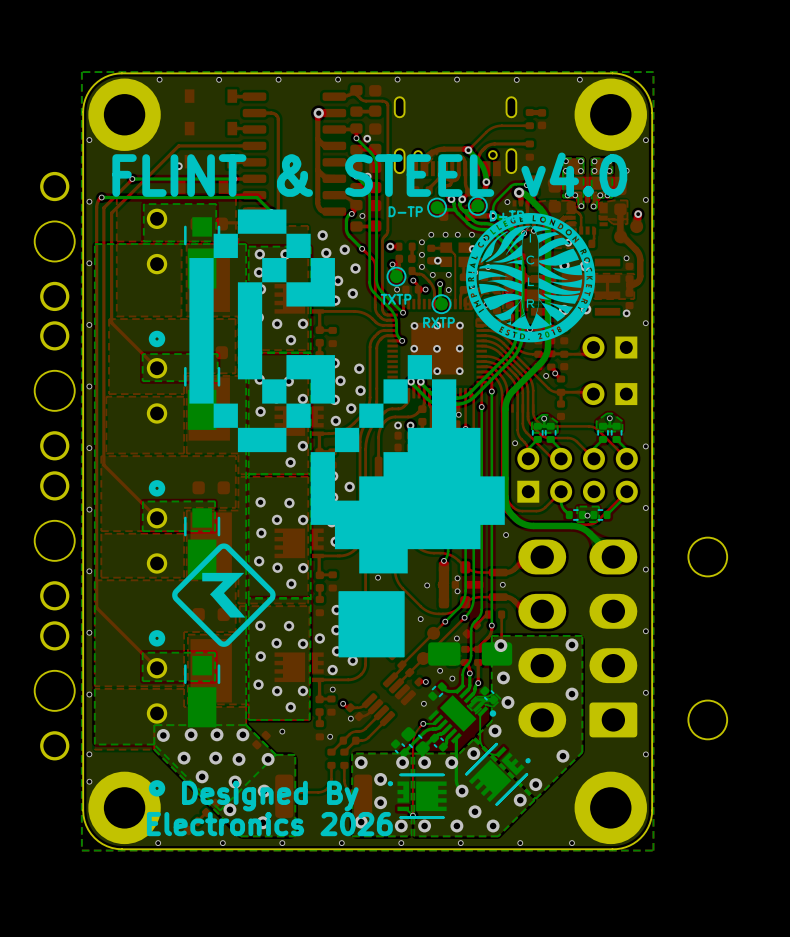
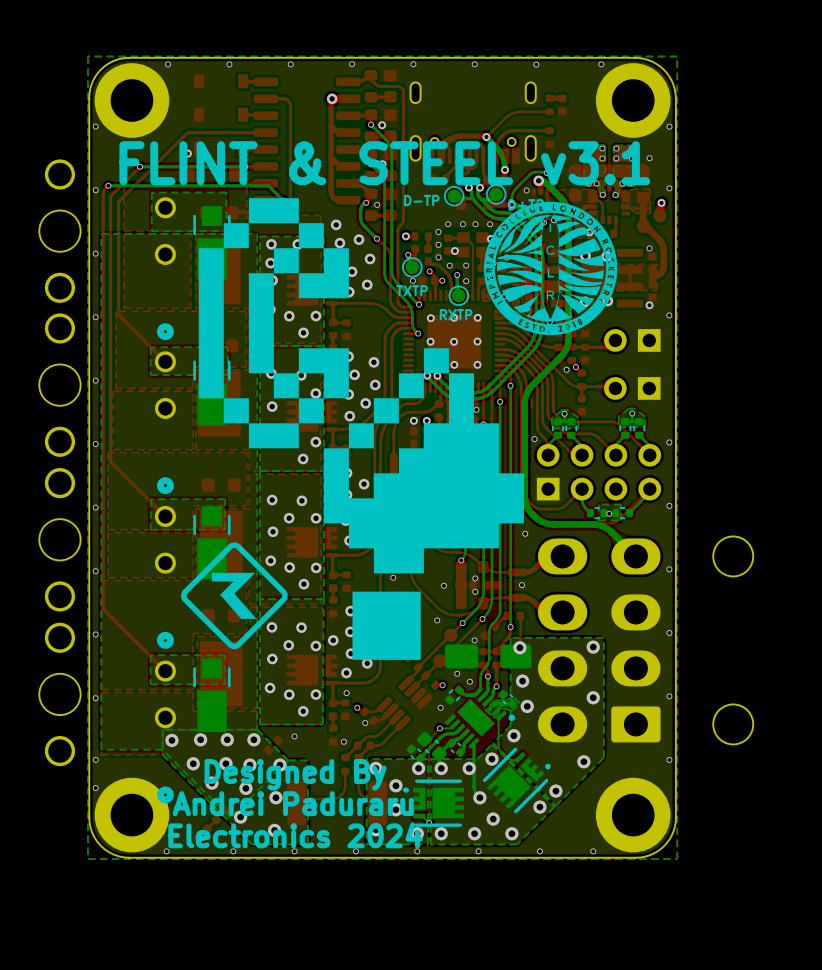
text: FLINT & STEEL v4.0 (369, 174) -> FLINT & STEEL v3.1 (384, 163)
text position: Designed By (270, 796) -> Designed By (295, 774)
text: none -> Andrei Paduraru (293, 803)
text: Electronics 2026 (269, 824) -> Electronics 2024 (295, 835)

